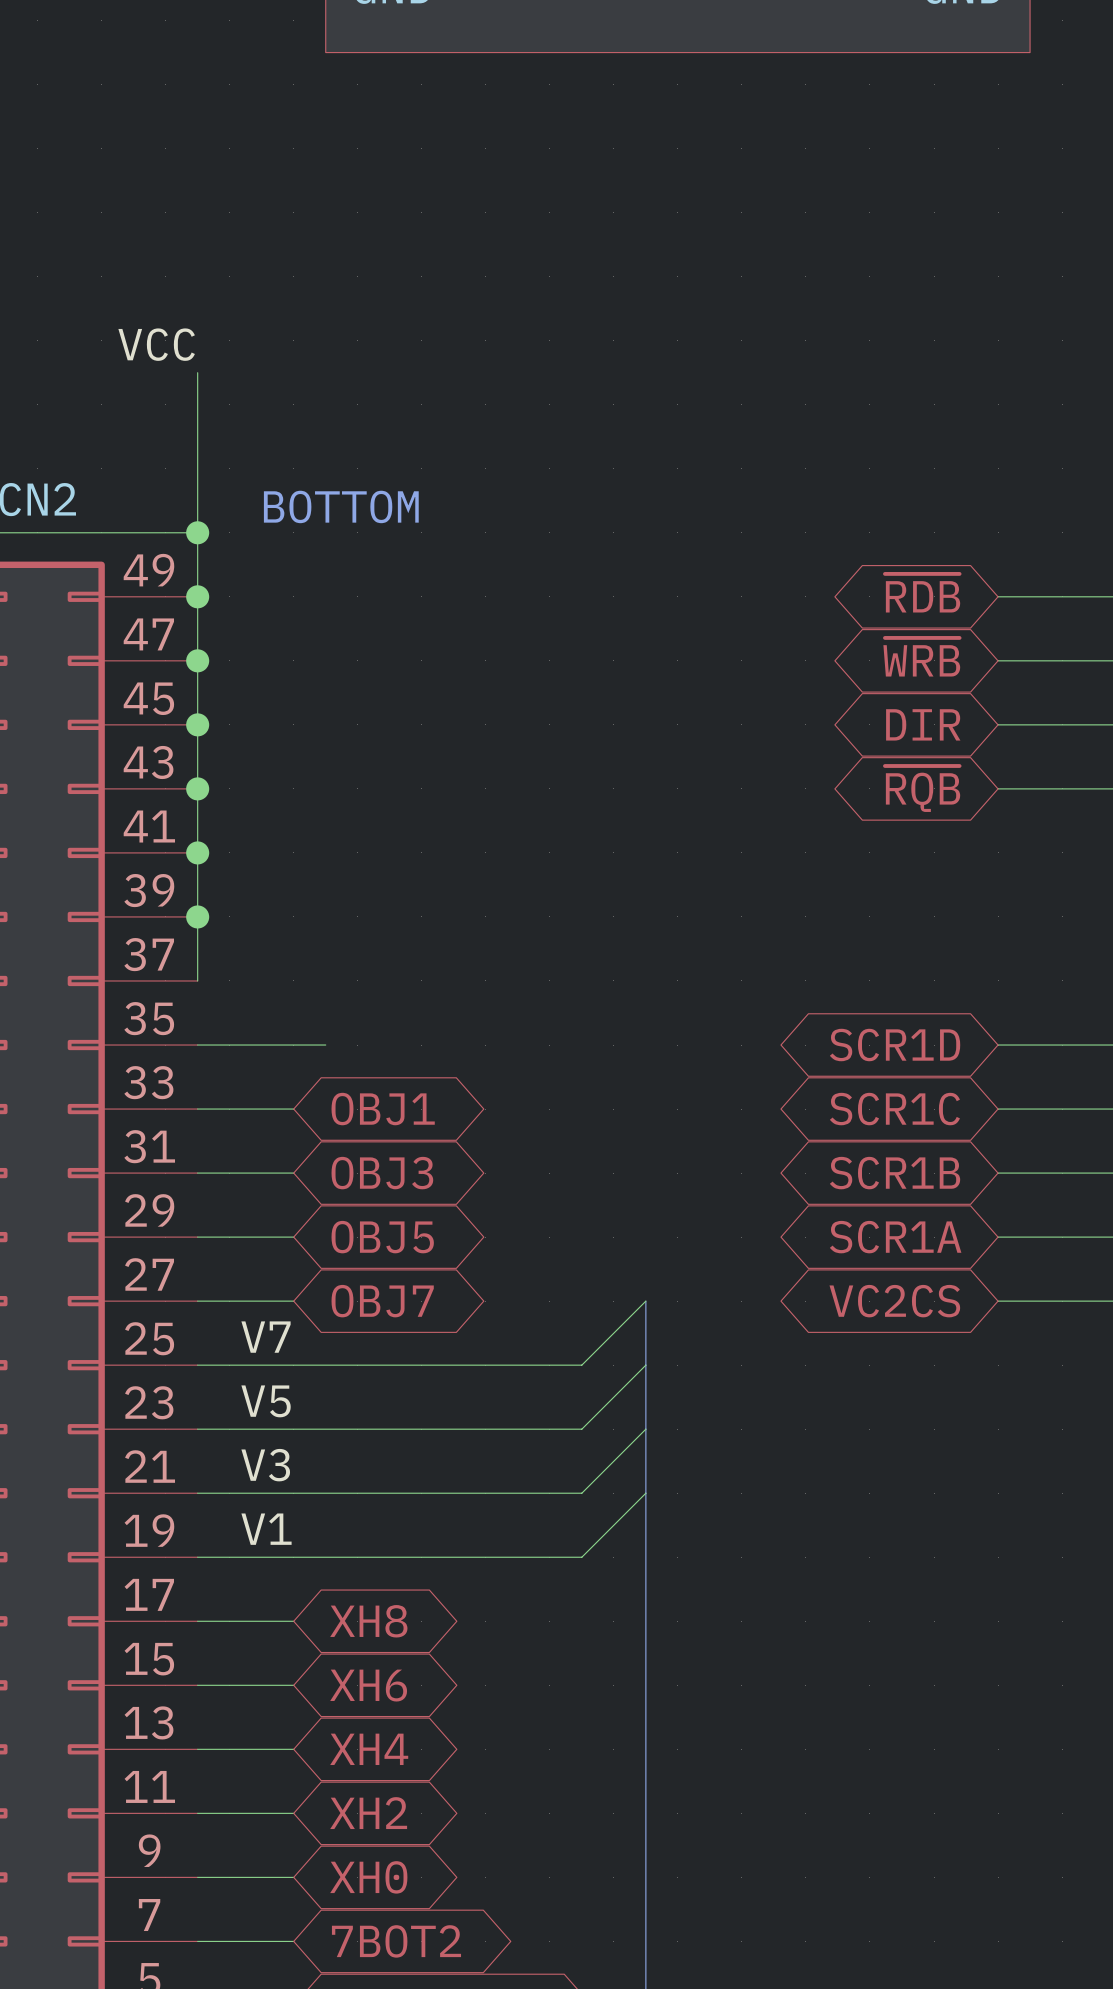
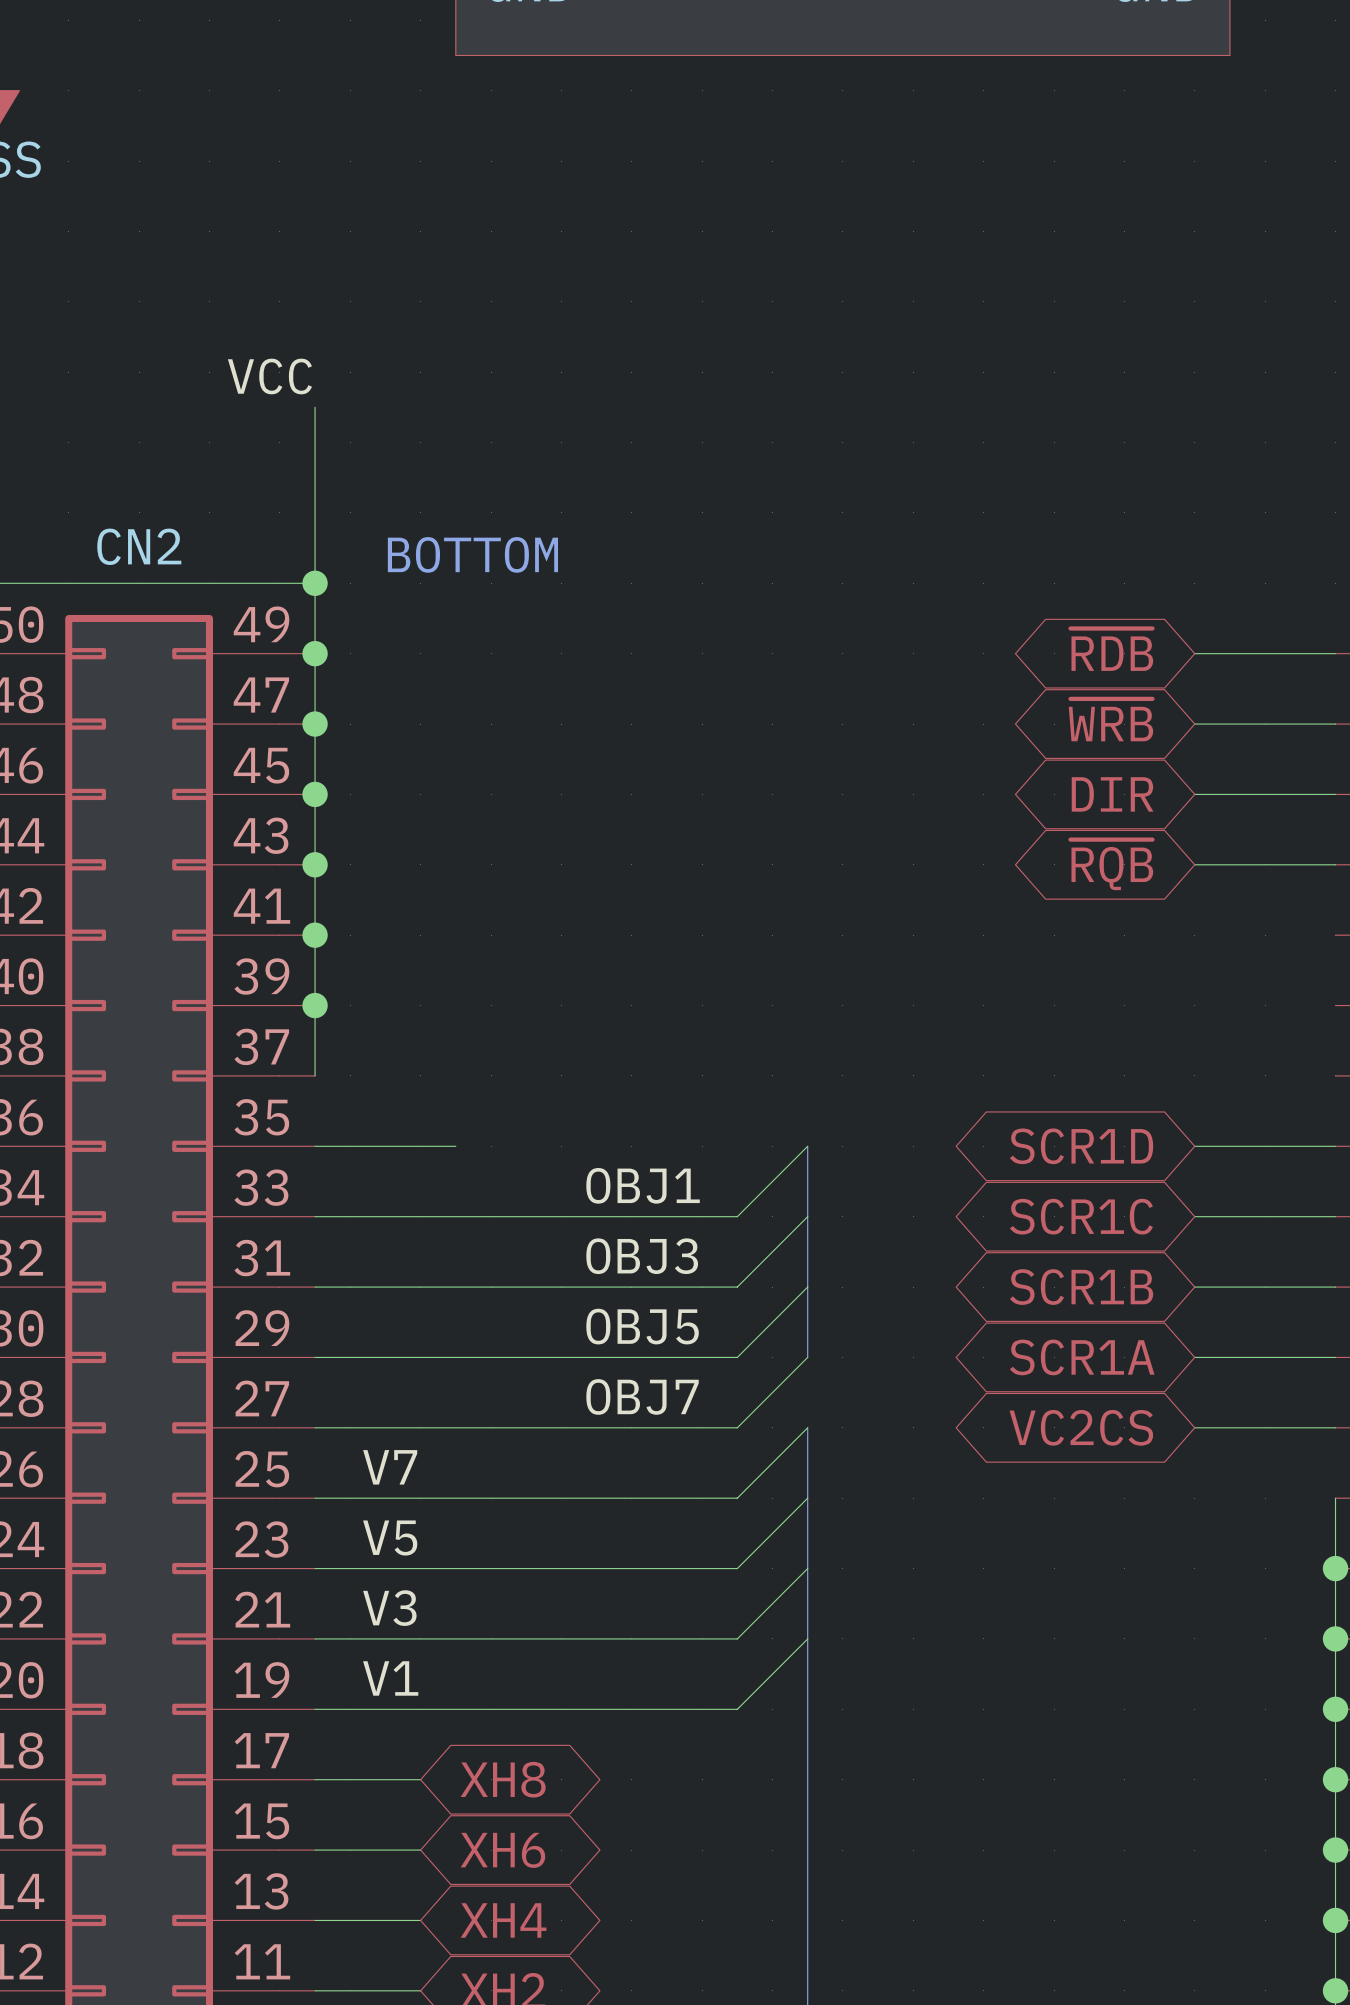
wire: none -> (807, 1146) (737, 1216) (420, 1216)
bus: none -> (807, 1146) (807, 1357)
label: none -> OBJ1 (643, 1185)
global label: OBJ1 (383, 1109) -> none
wire: none -> (807, 1216) (737, 1287) (420, 1287)
label: none -> OBJ3 (642, 1256)
global label: OBJ3 (382, 1173) -> none
wire: none -> (807, 1287) (737, 1357) (420, 1357)
label: none -> OBJ5 (642, 1326)
global label: OBJ5 (382, 1237) -> none
wire: none -> (807, 1357) (737, 1427) (420, 1427)
label: none -> OBJ7 (642, 1396)
global label: OBJ7 (382, 1301) -> none

